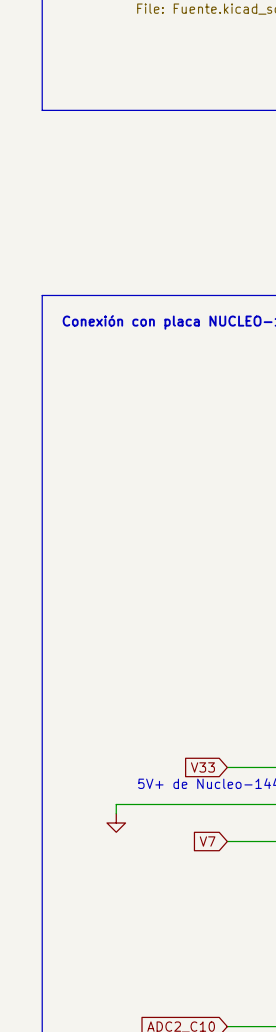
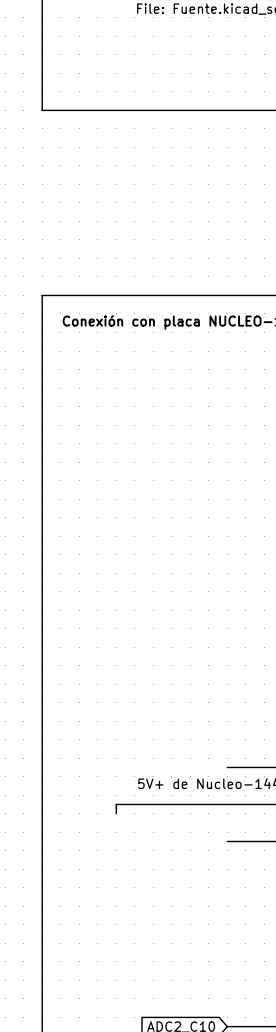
global label: V33 (202, 767) -> none
power symbol: (116, 823) -> none
global label: V7 (207, 841) -> none

